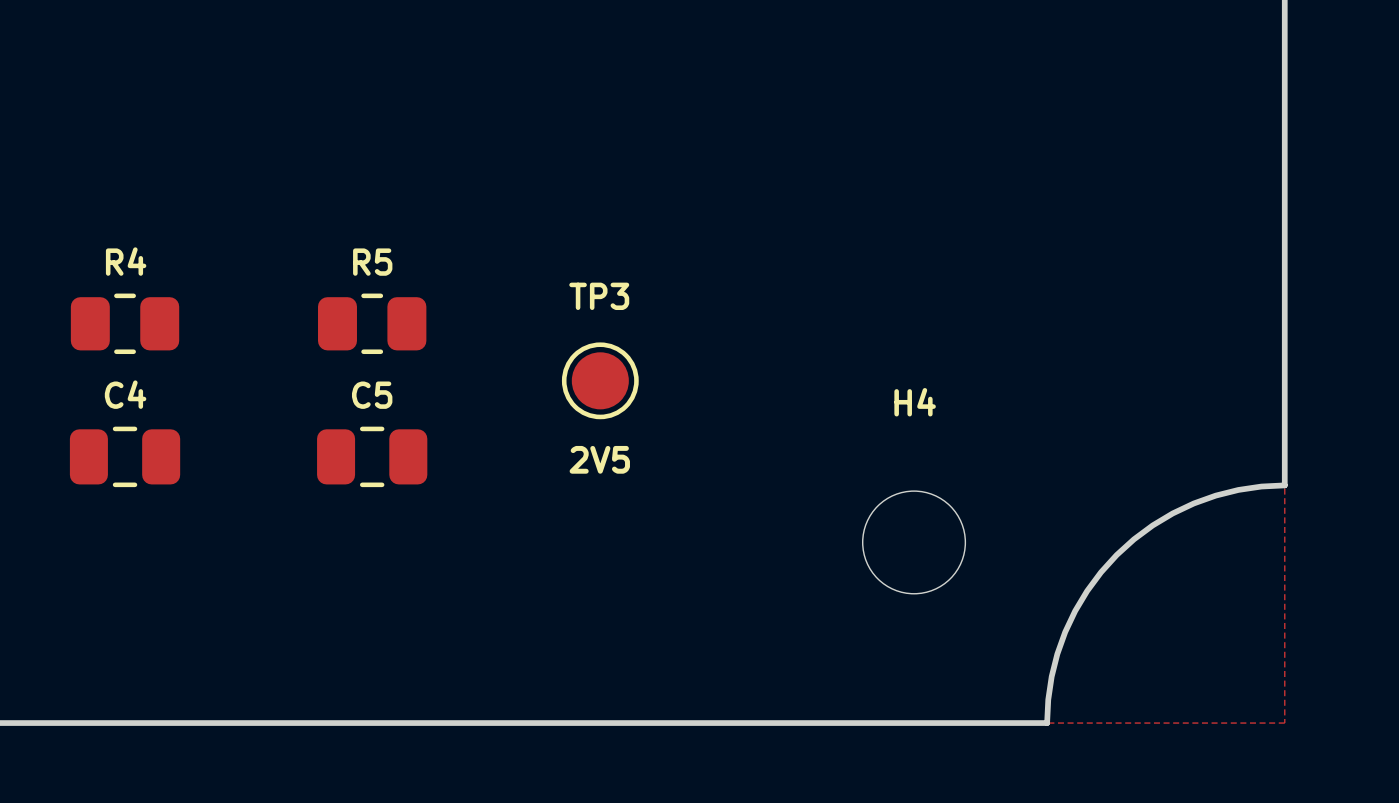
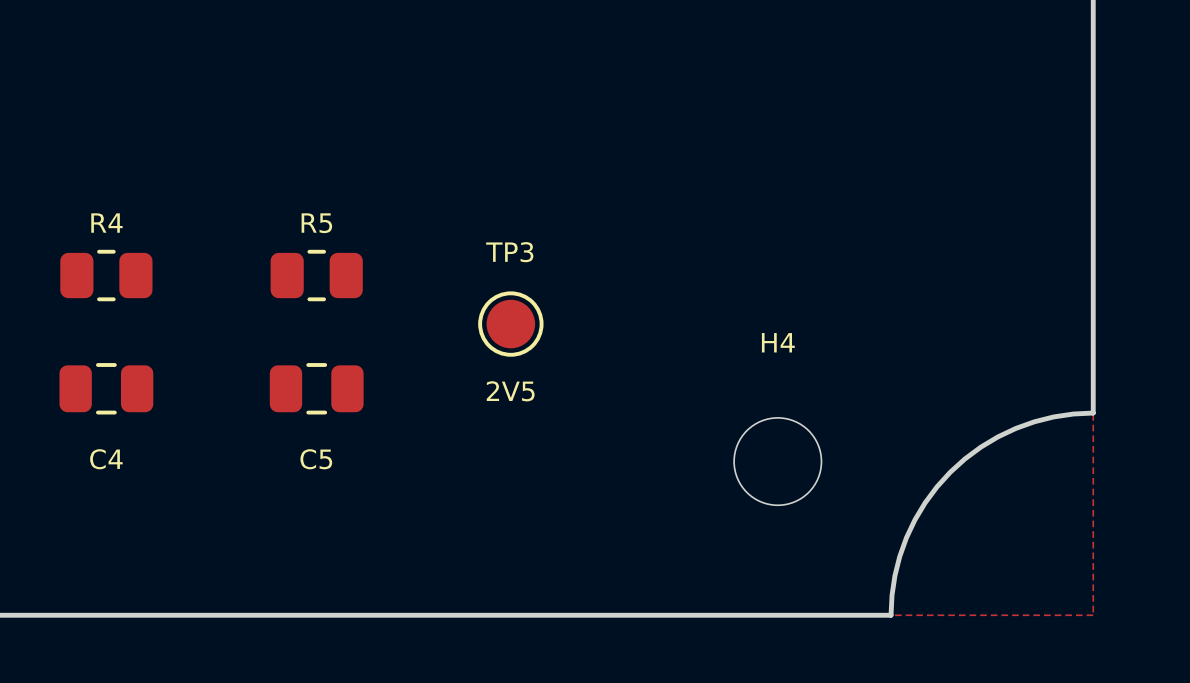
C4 name position: C4 (125, 394) -> C4 (106, 459)
C5 name position: C5 (372, 395) -> C5 (316, 459)

